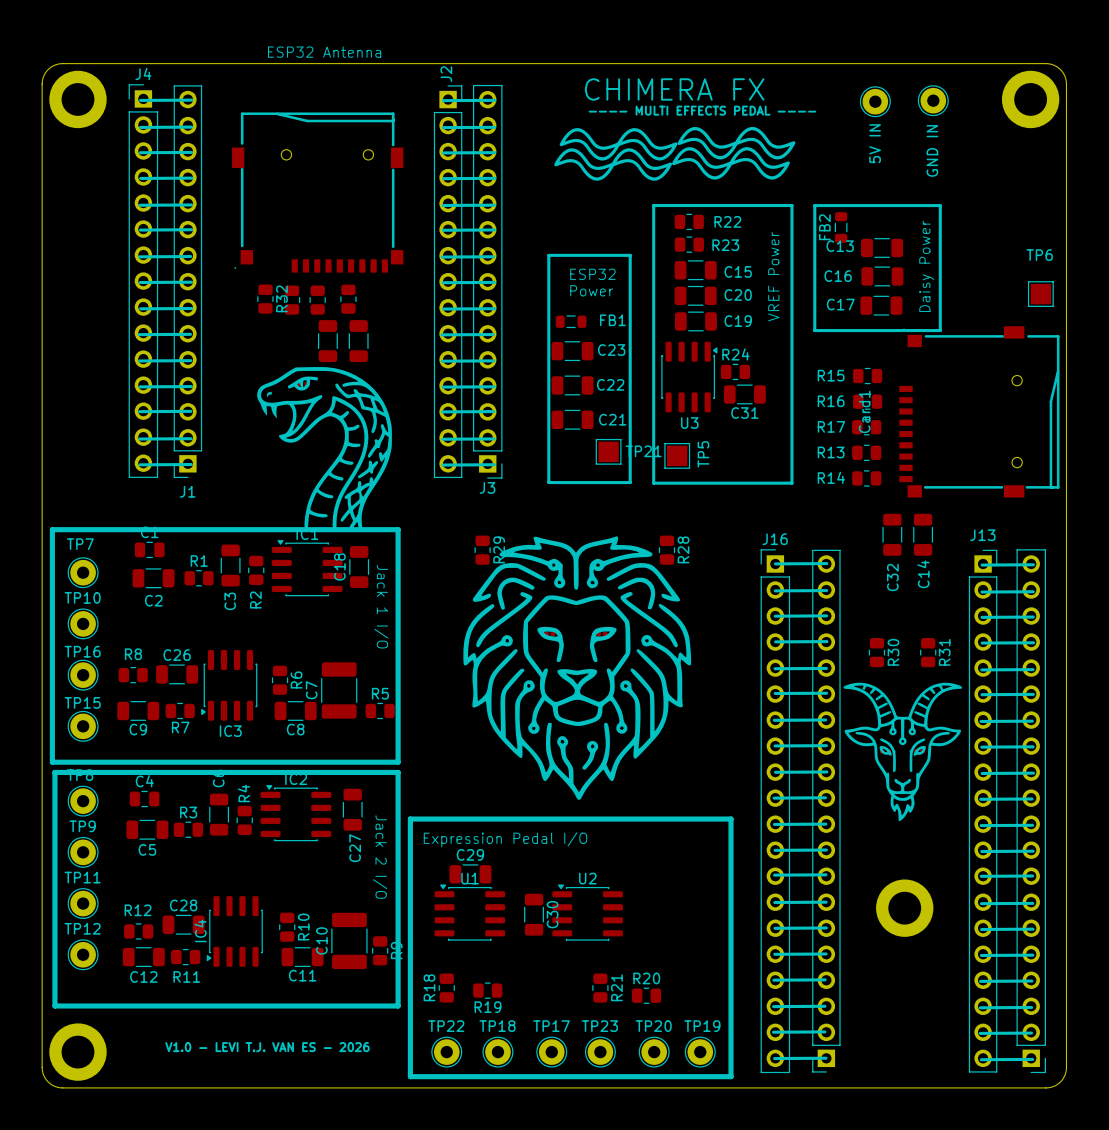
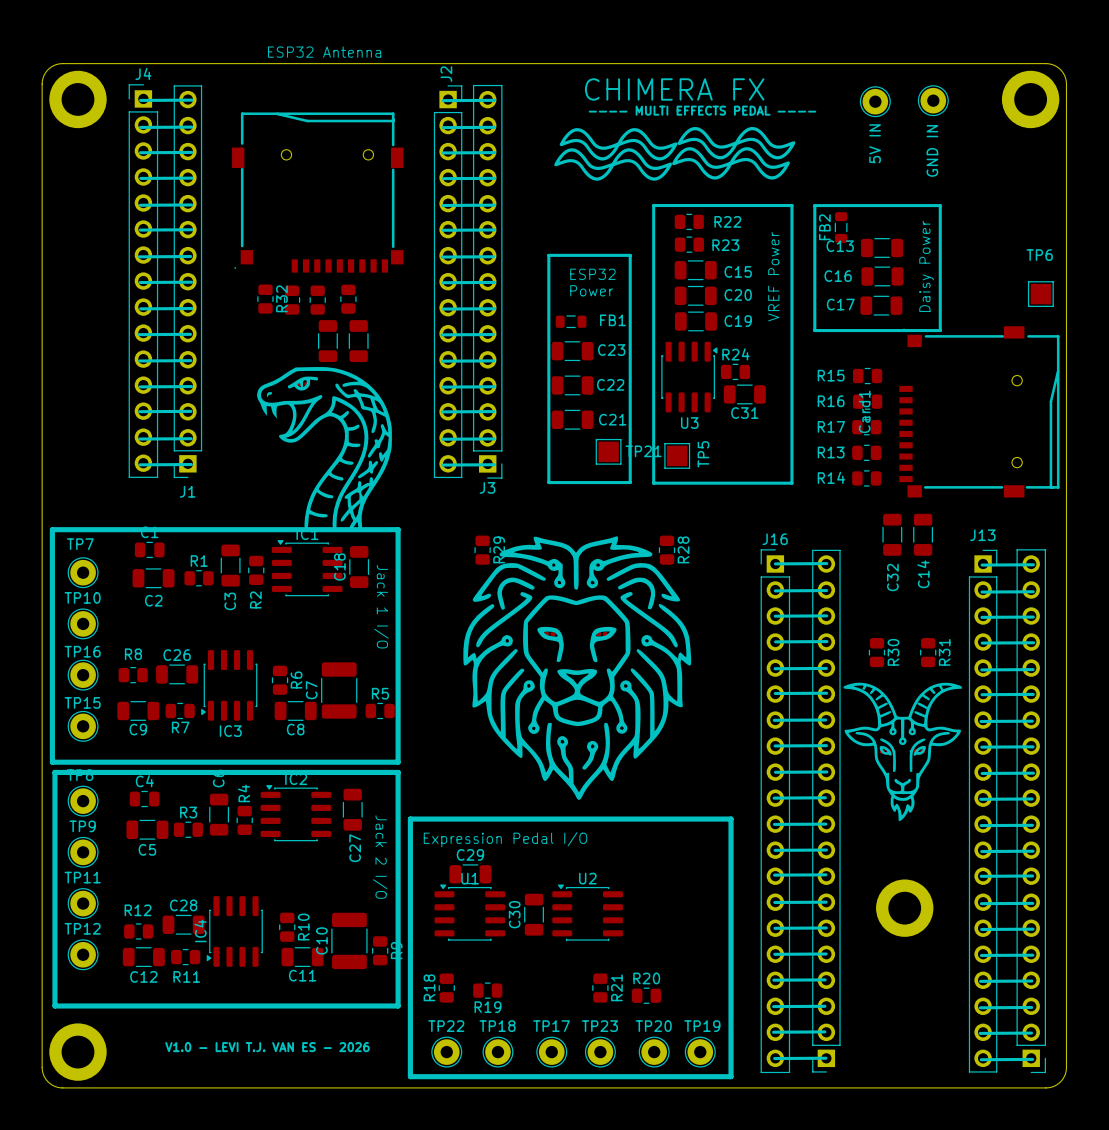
C30 name position: C30 (552, 914) -> C30 (514, 914)

